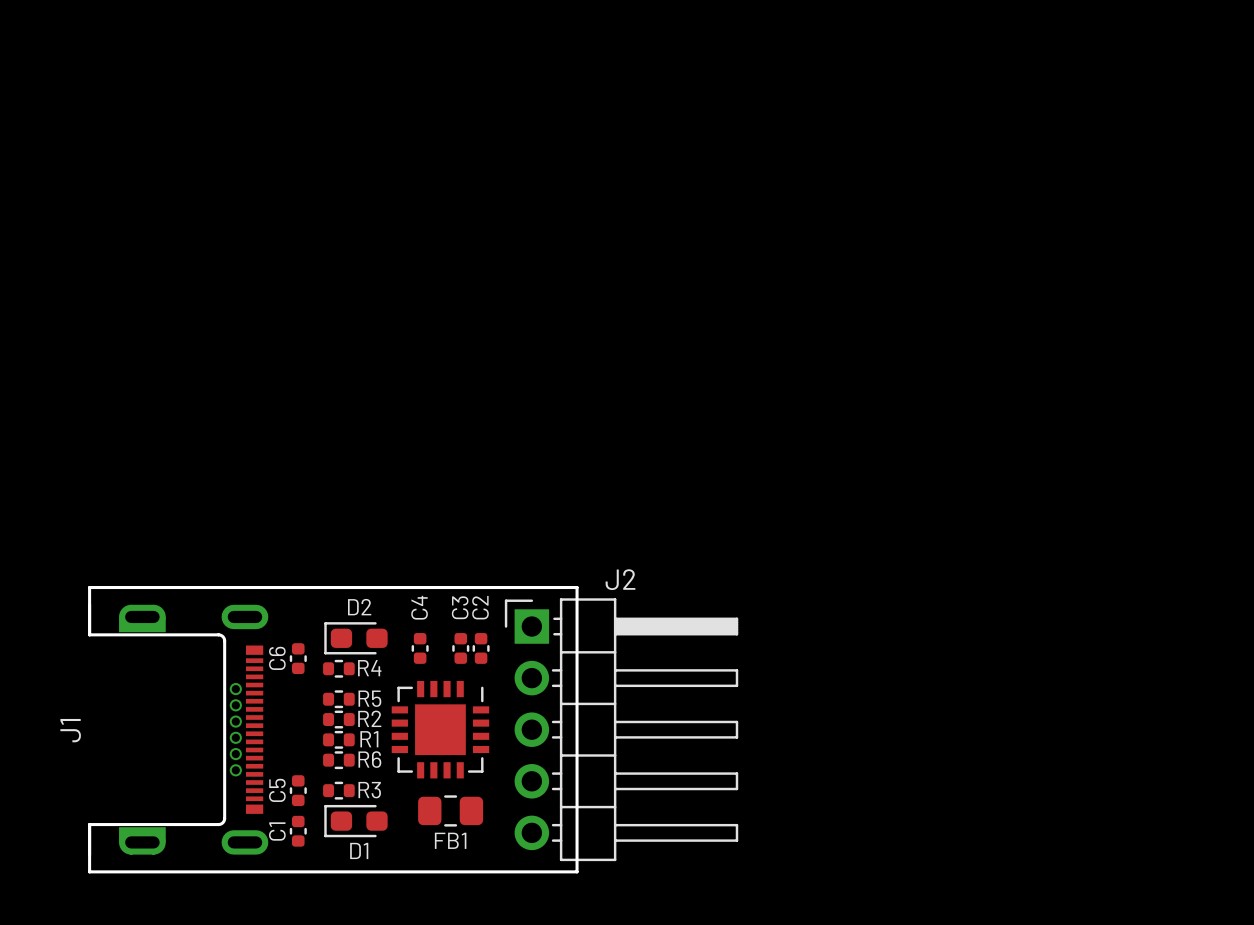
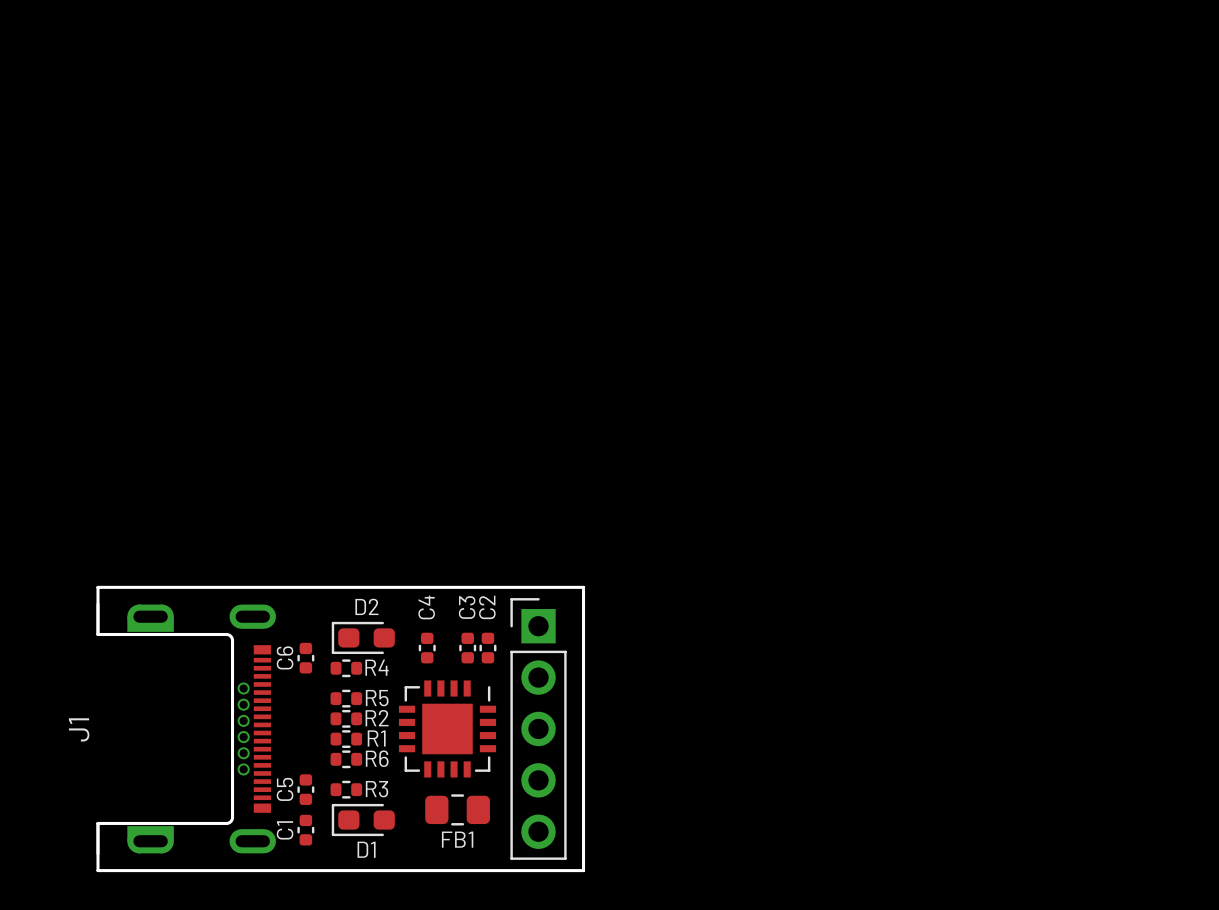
part: none -> (538, 728)
J2: (621, 729) -> none

